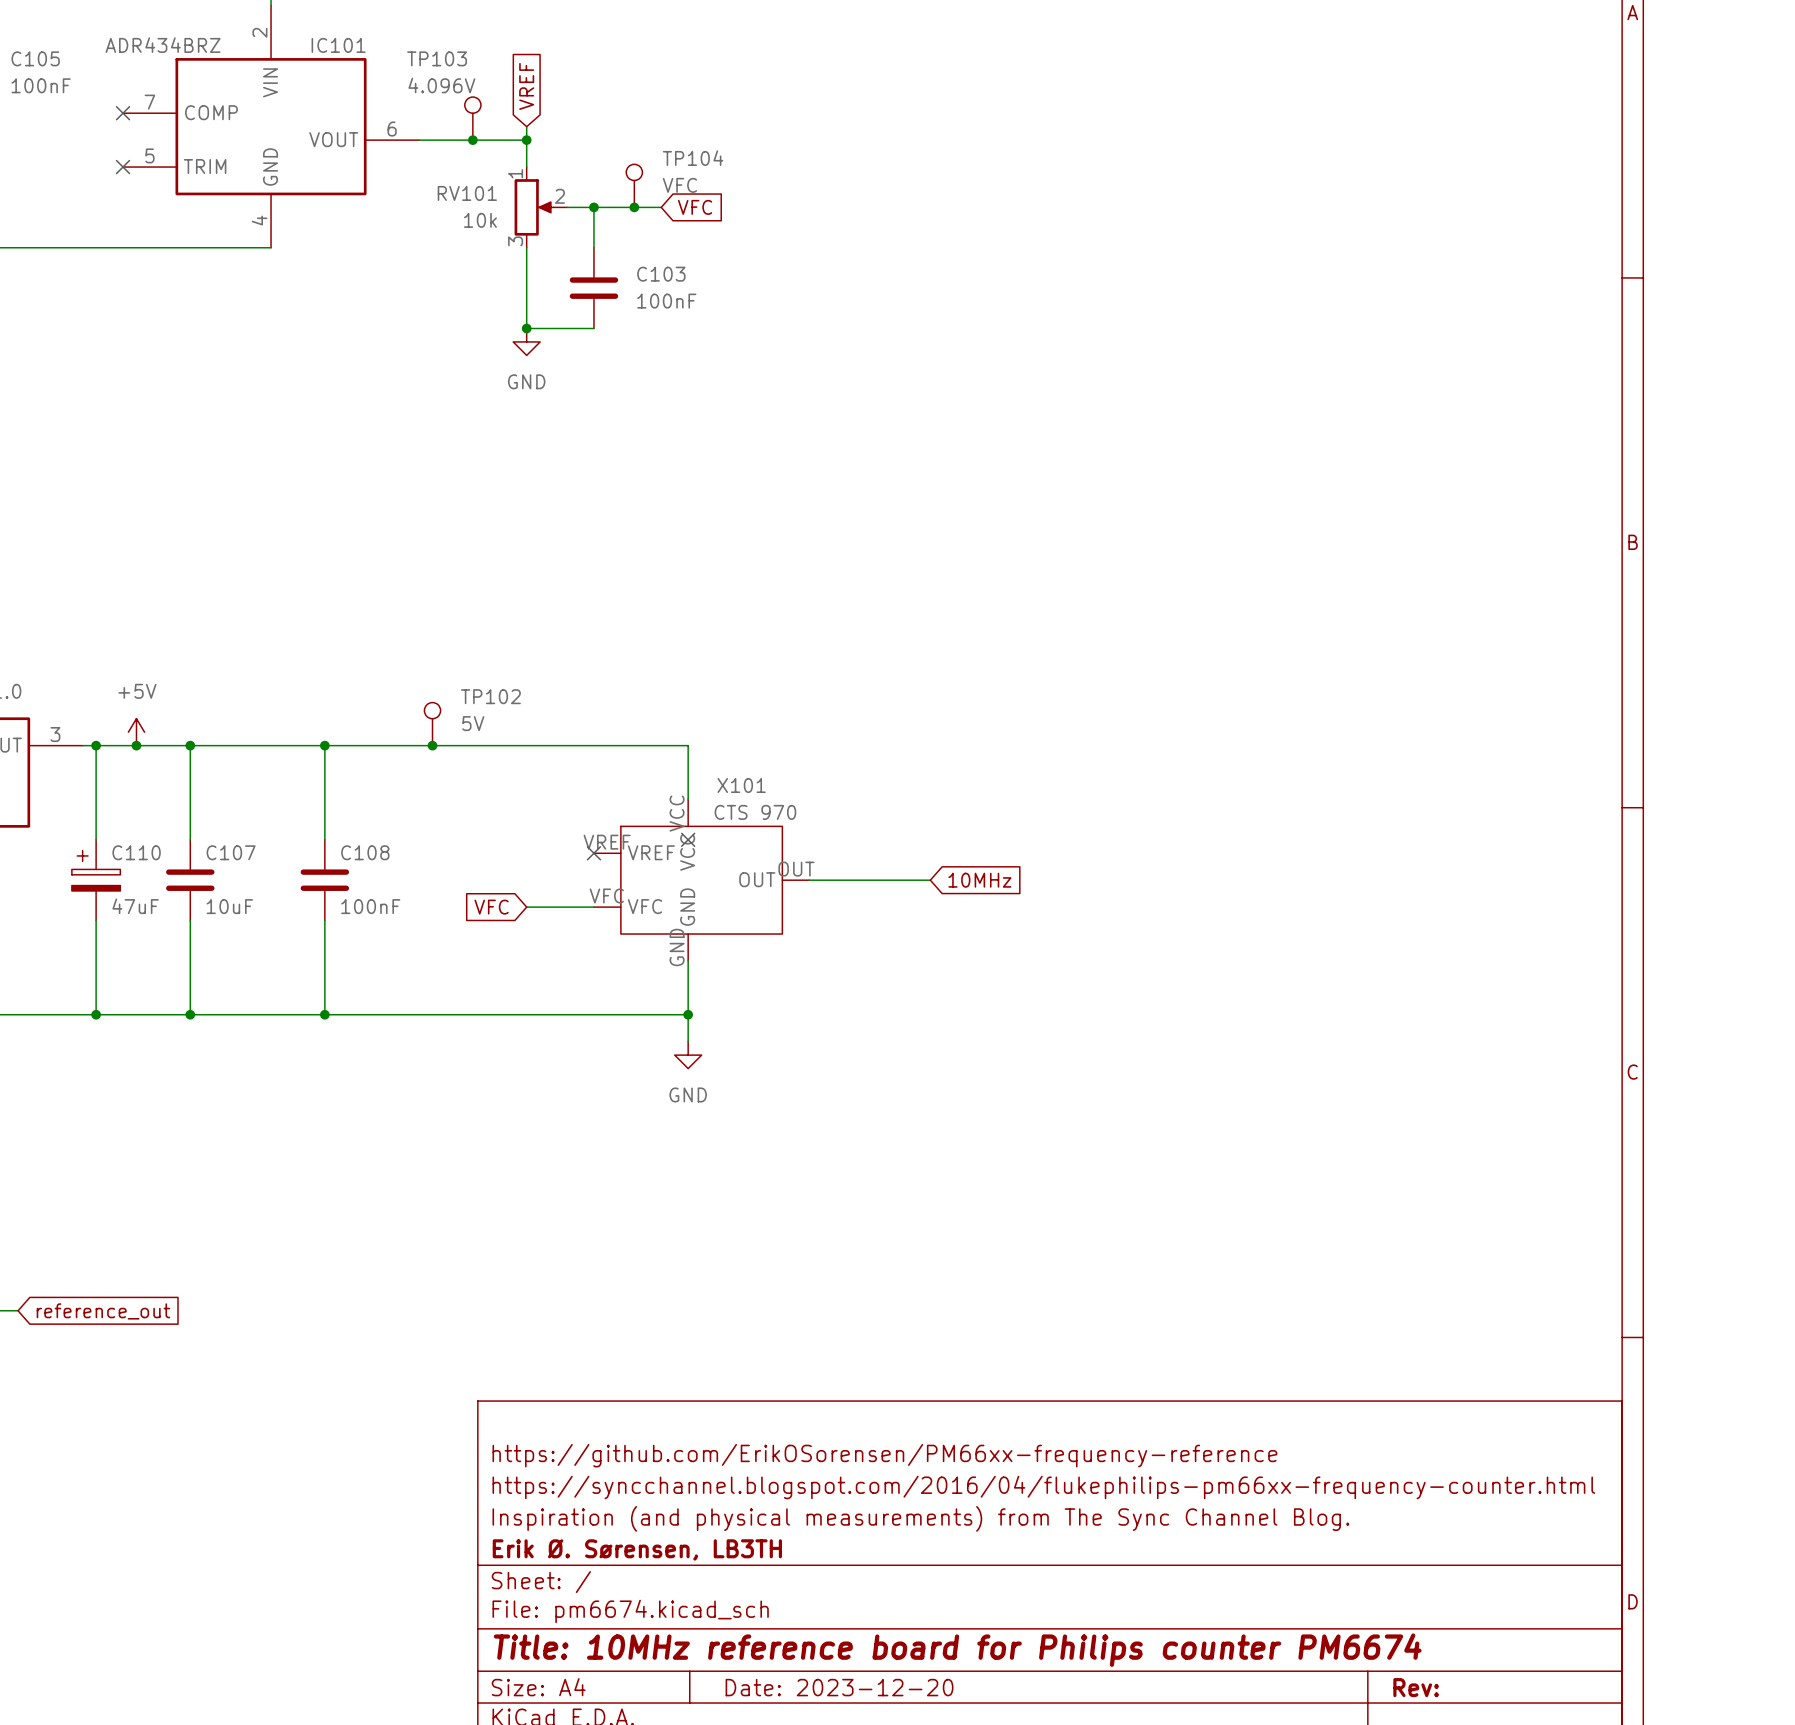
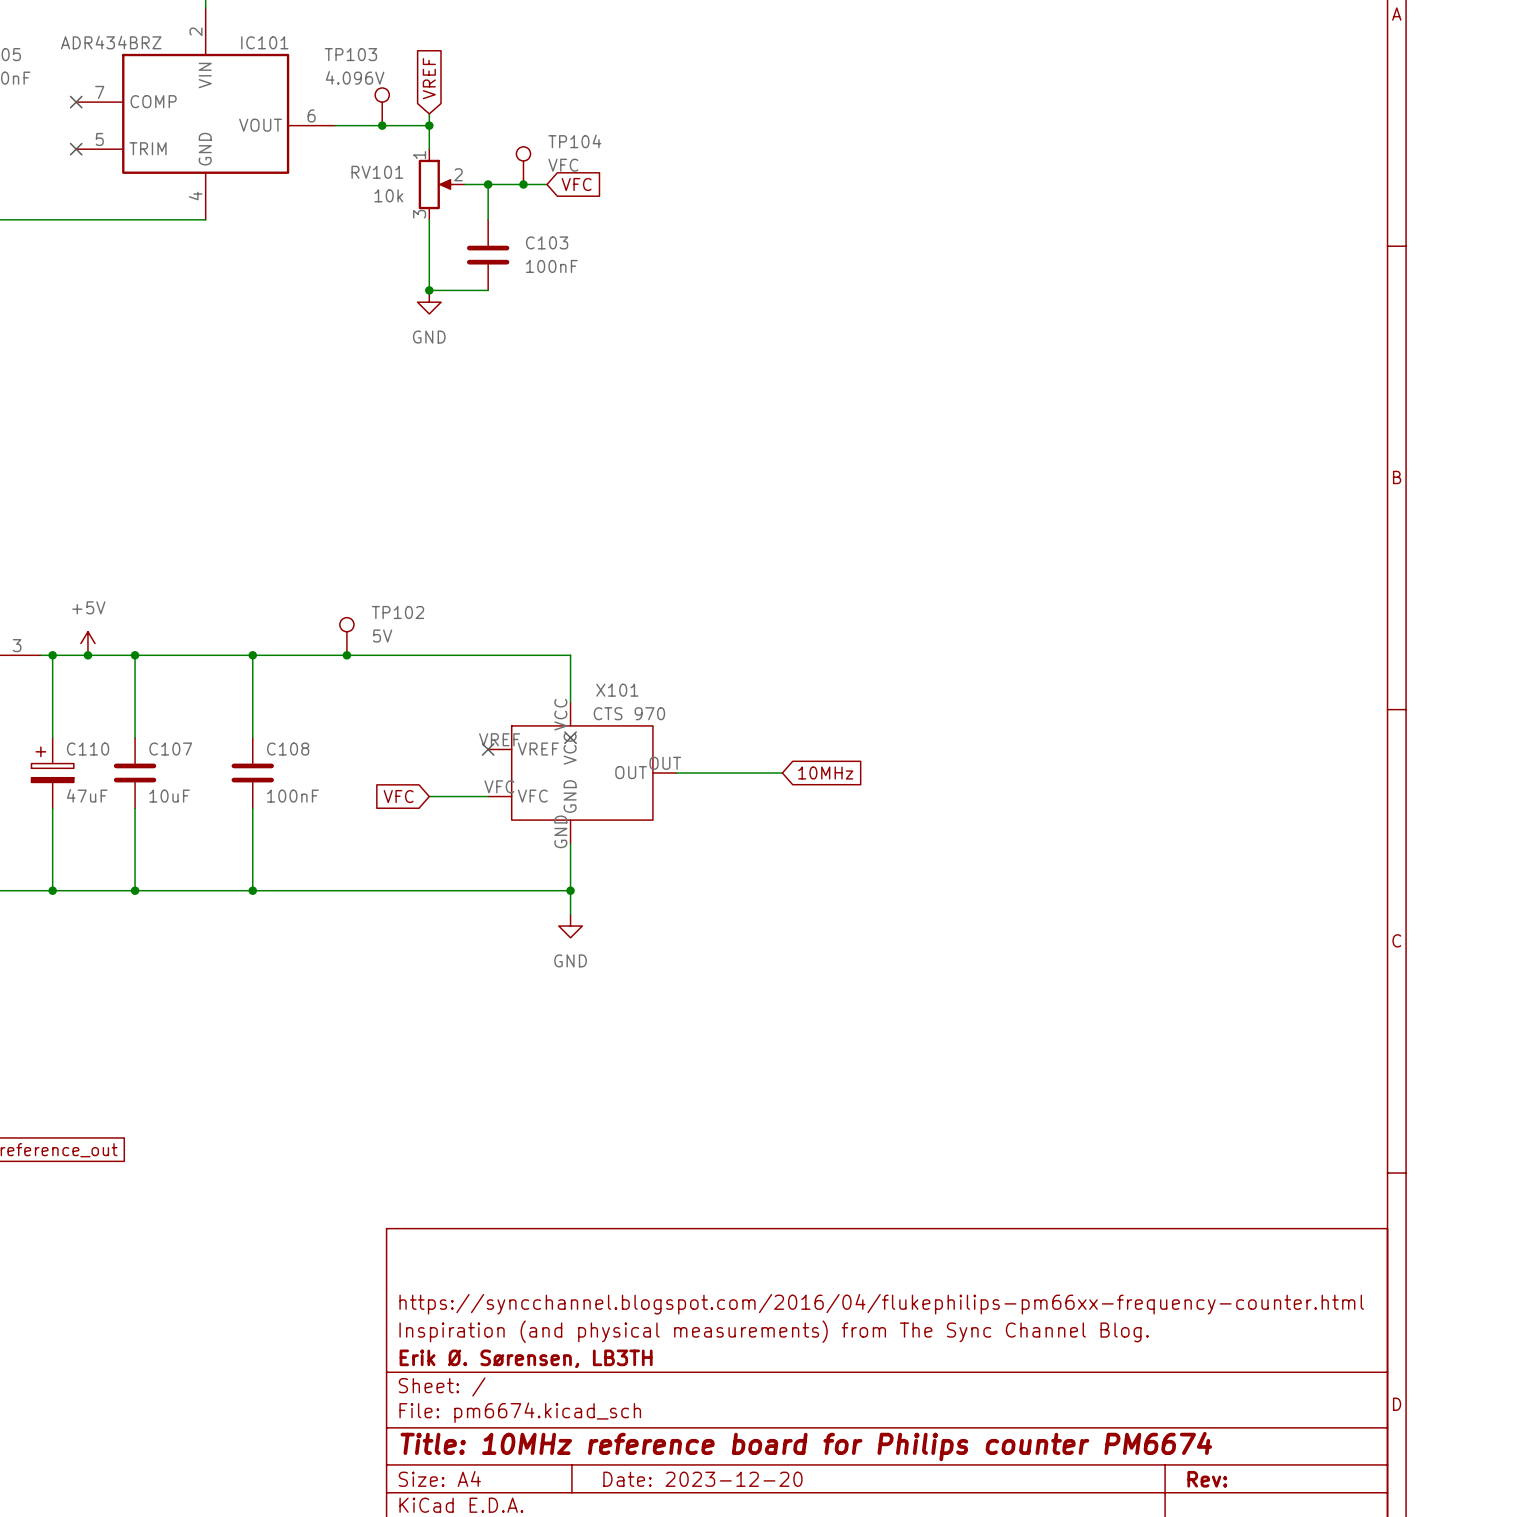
title block: https://github.com/ErikOSorensen/PM66xx-frequency-reference (884, 1455) -> none

